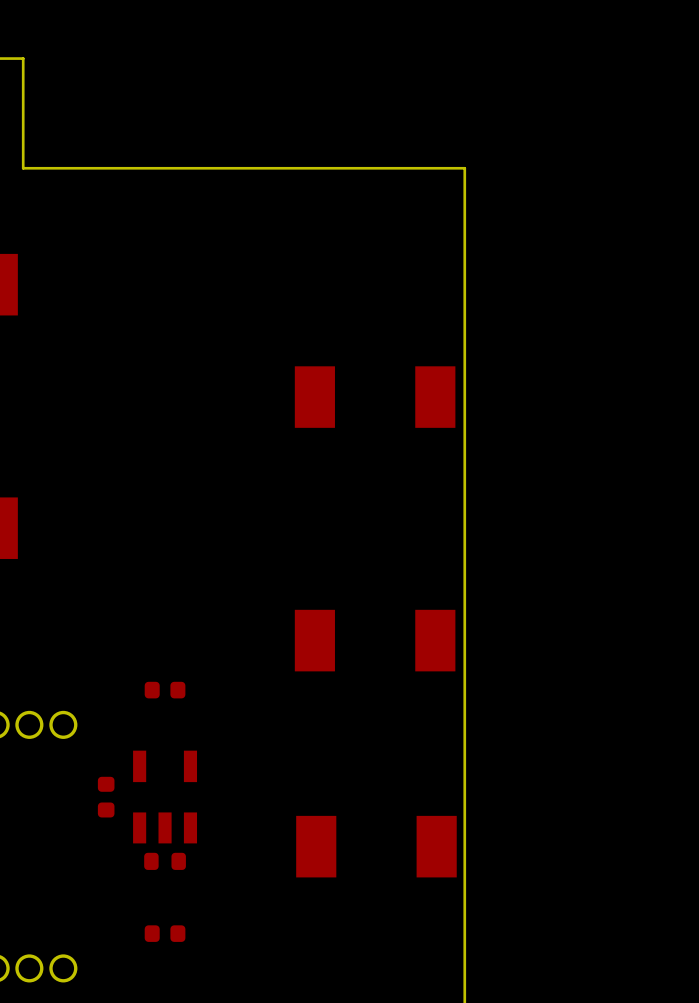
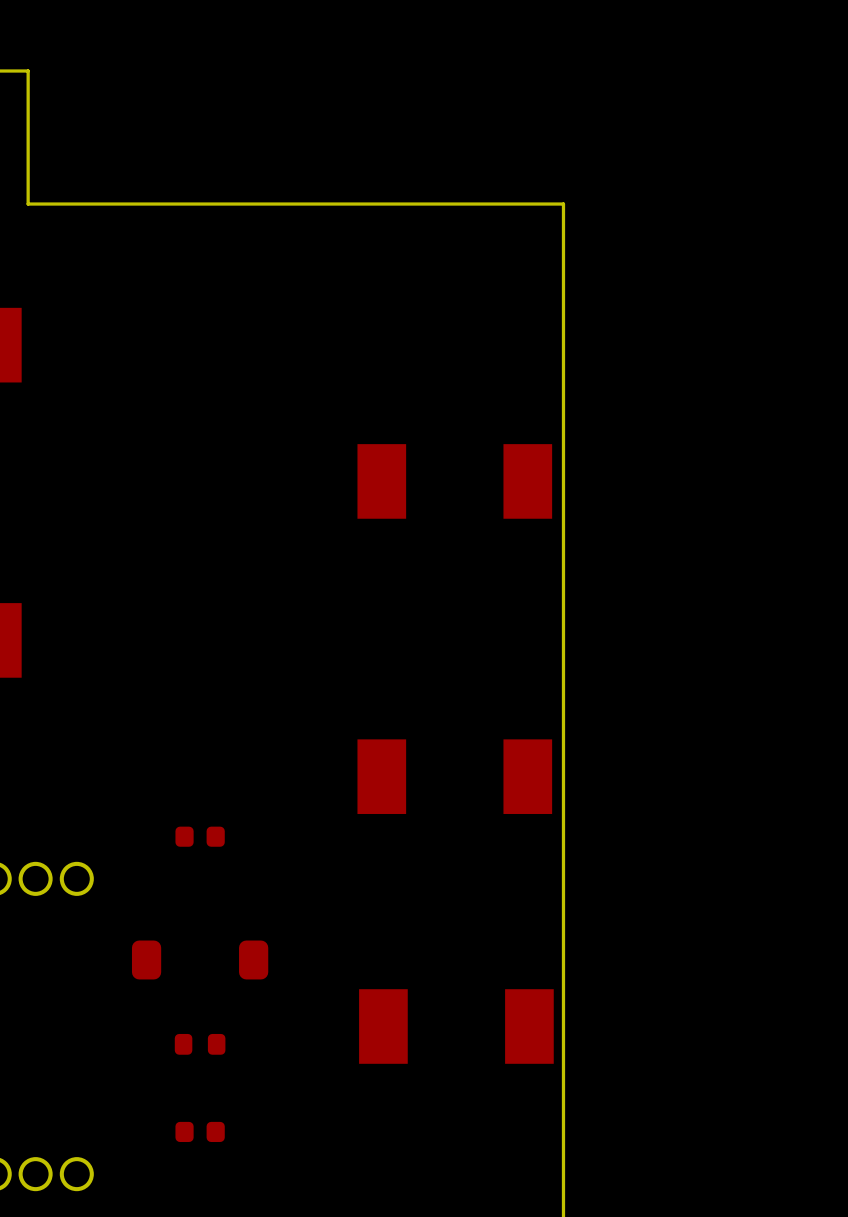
part footprint: [133, 750, 198, 844] -> [131, 940, 269, 980]
part: (106, 797) -> none

